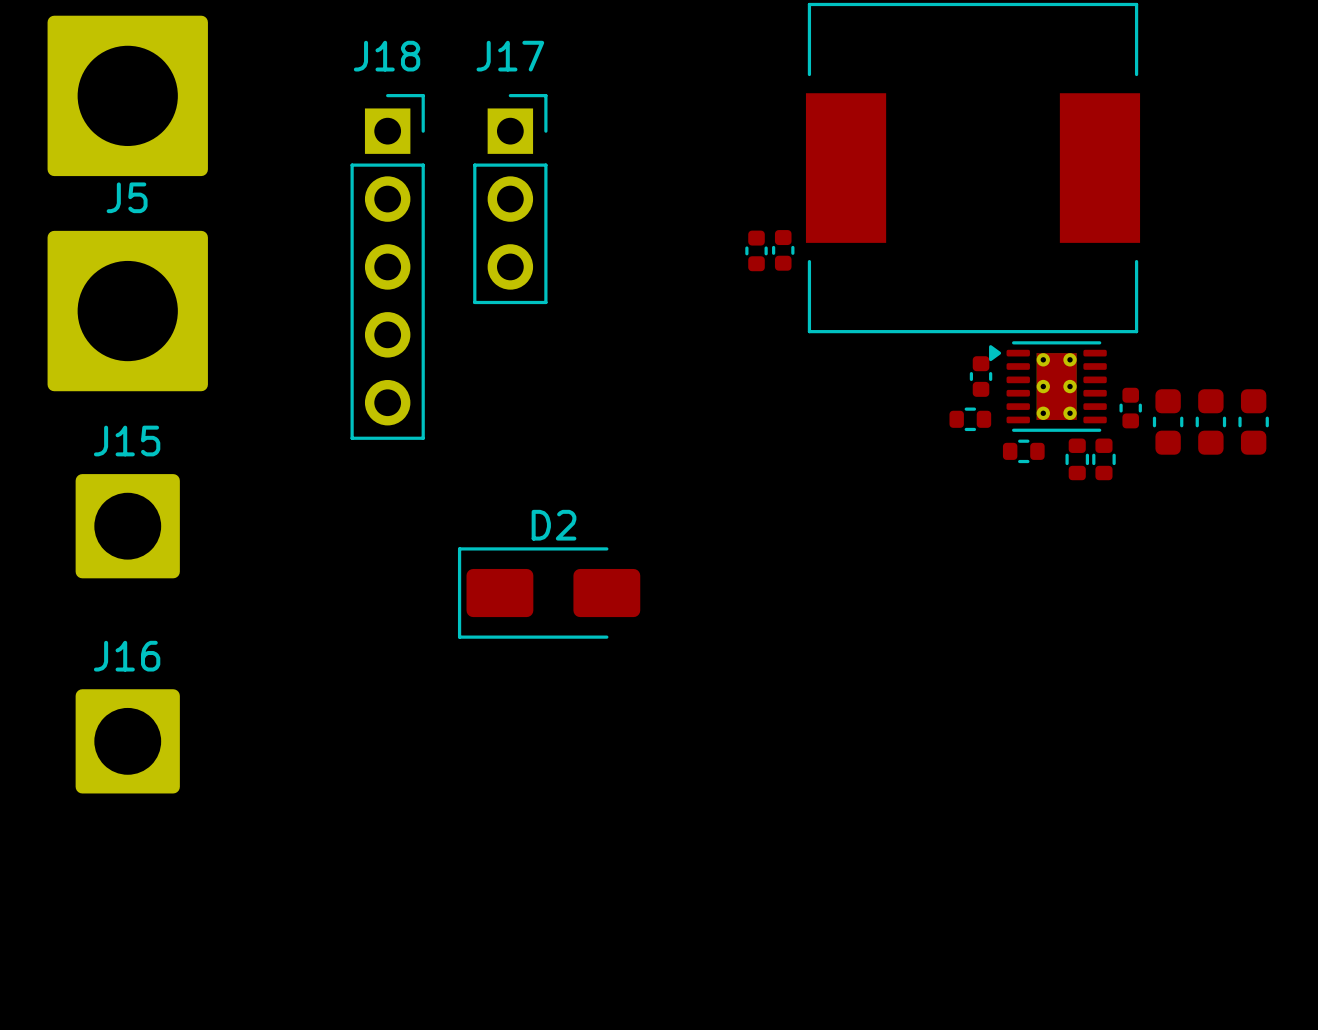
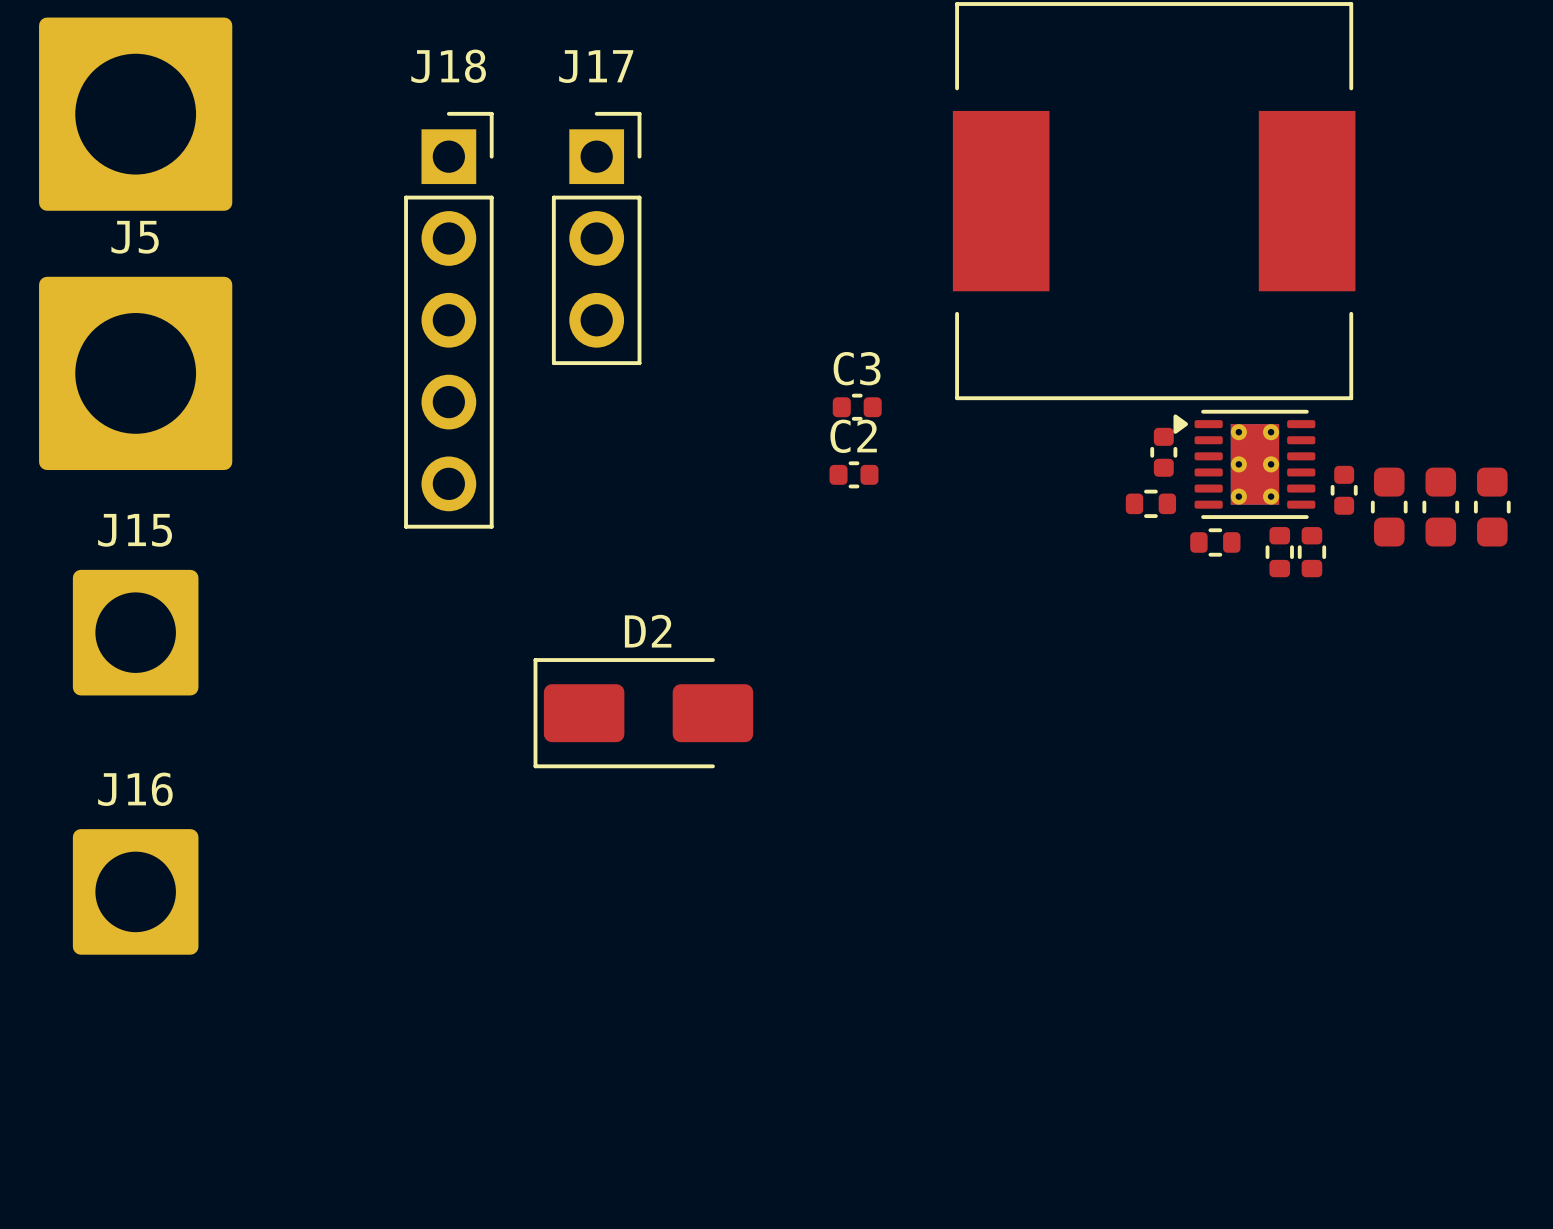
part: (756, 250) -> none
part: (783, 250) -> none
C3: none -> (857, 407)
C2: none -> (854, 474)

